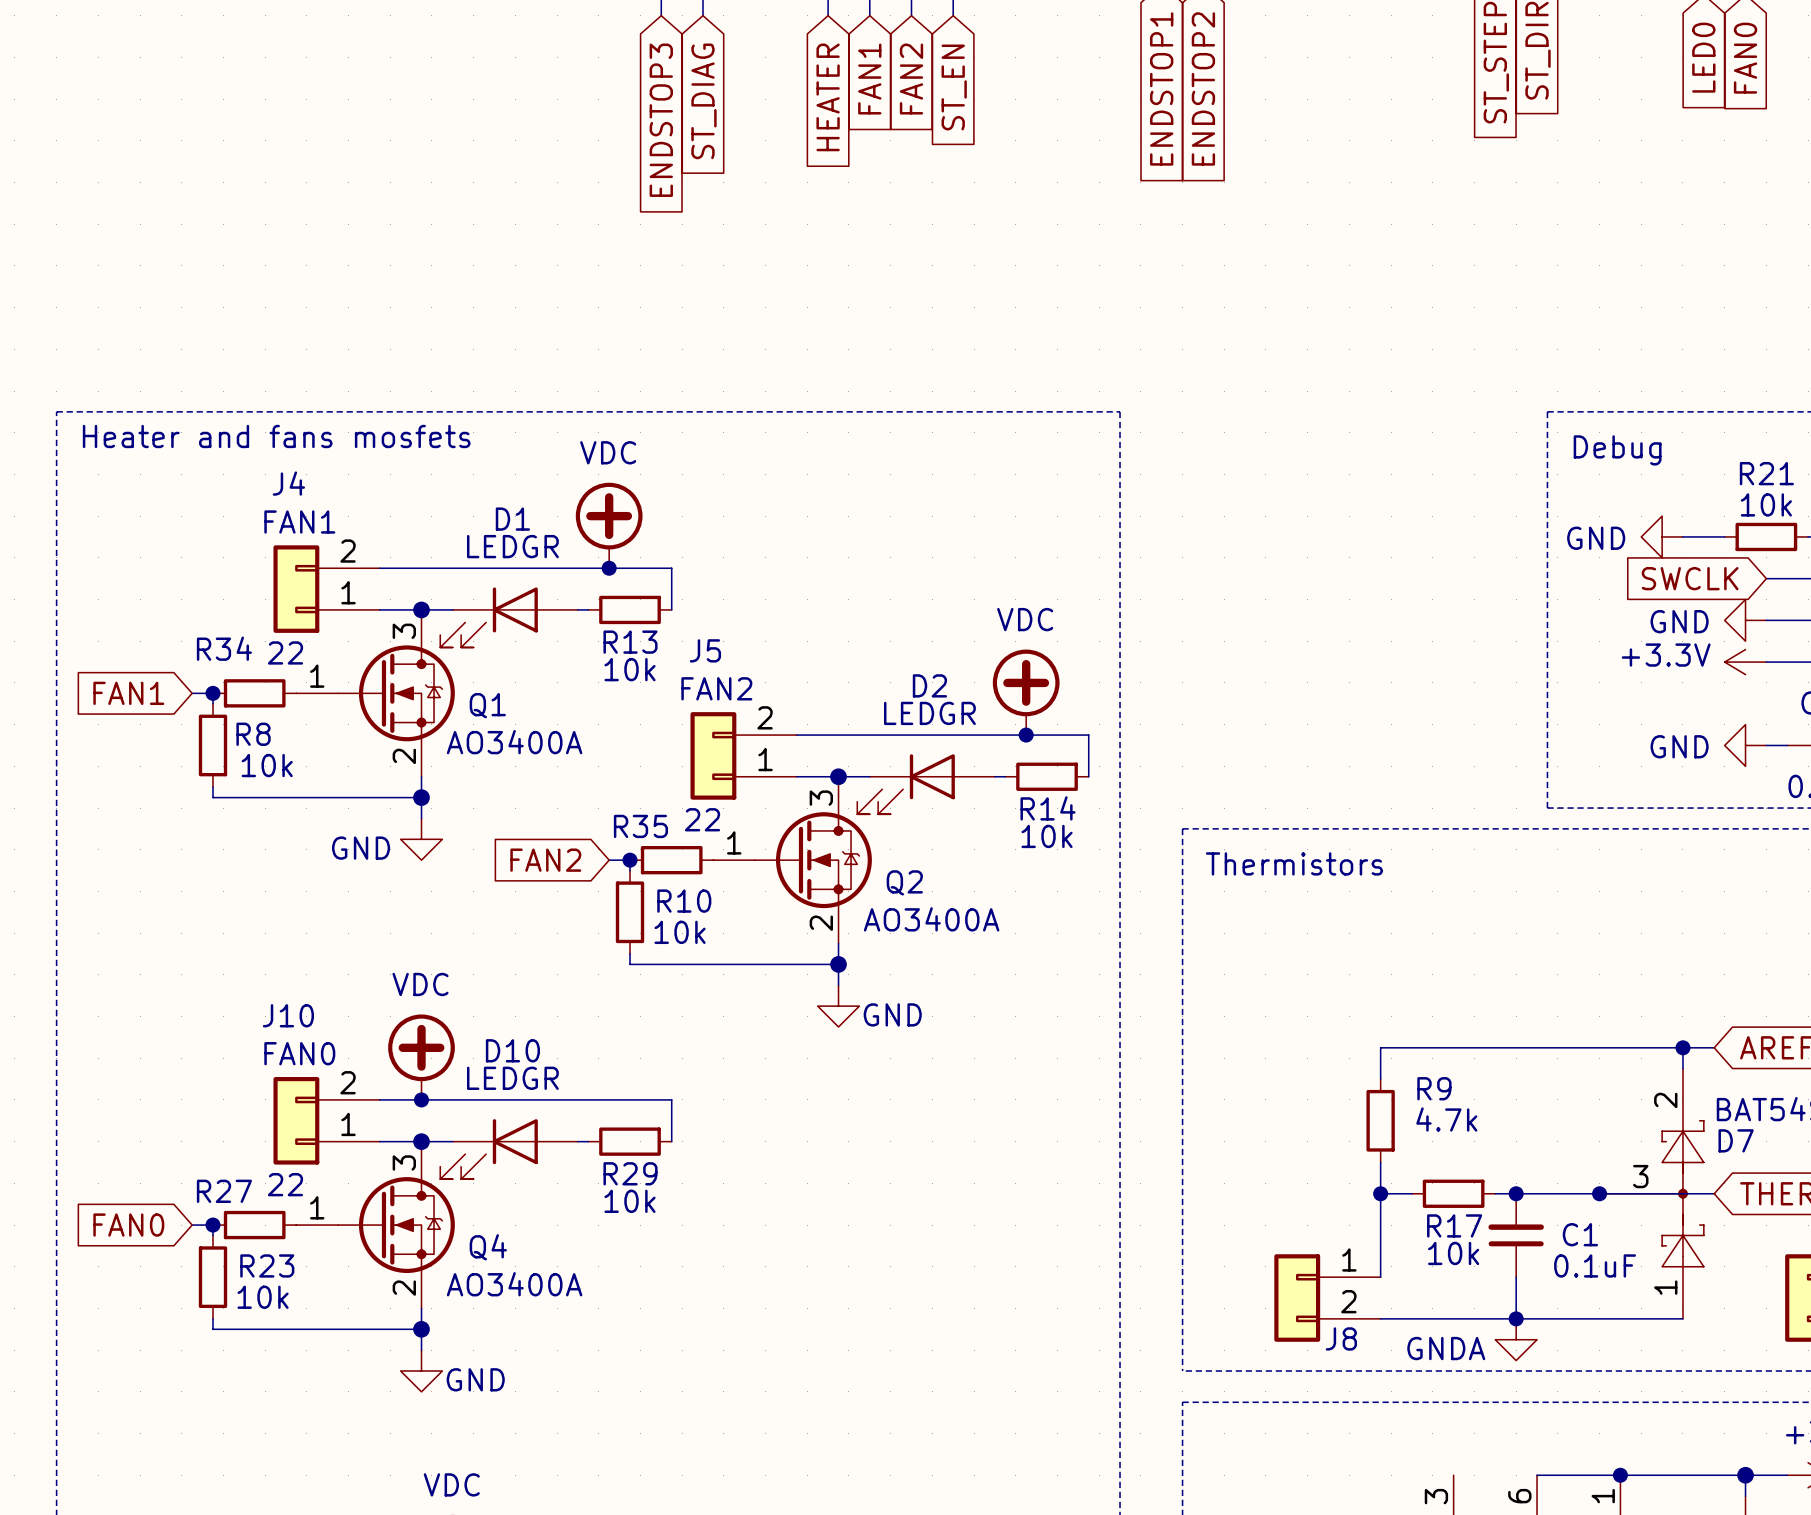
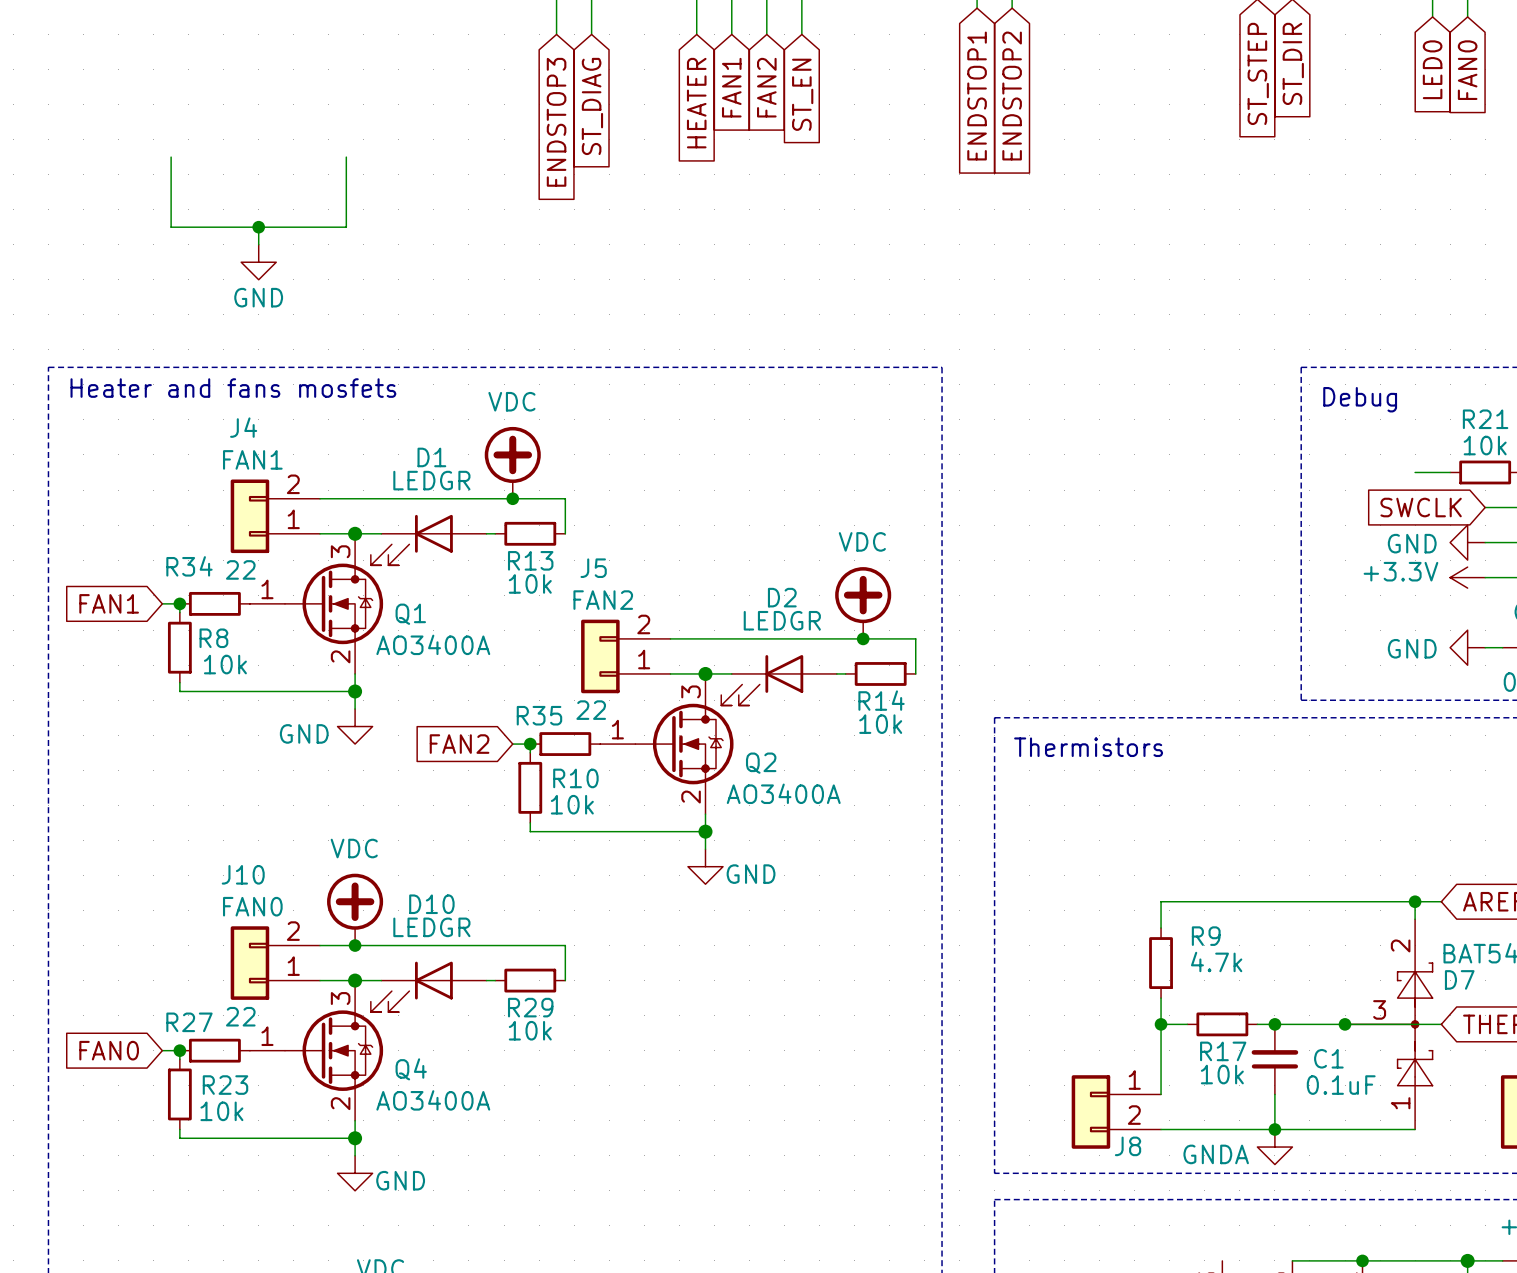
wire: none -> (171, 157) (171, 227) (346, 227) (346, 157)
wire: none -> (258, 227) (258, 244)
junction: none -> (258, 227)
power symbol: none -> GND (258, 262)
power symbol: GND (1662, 536) -> none

